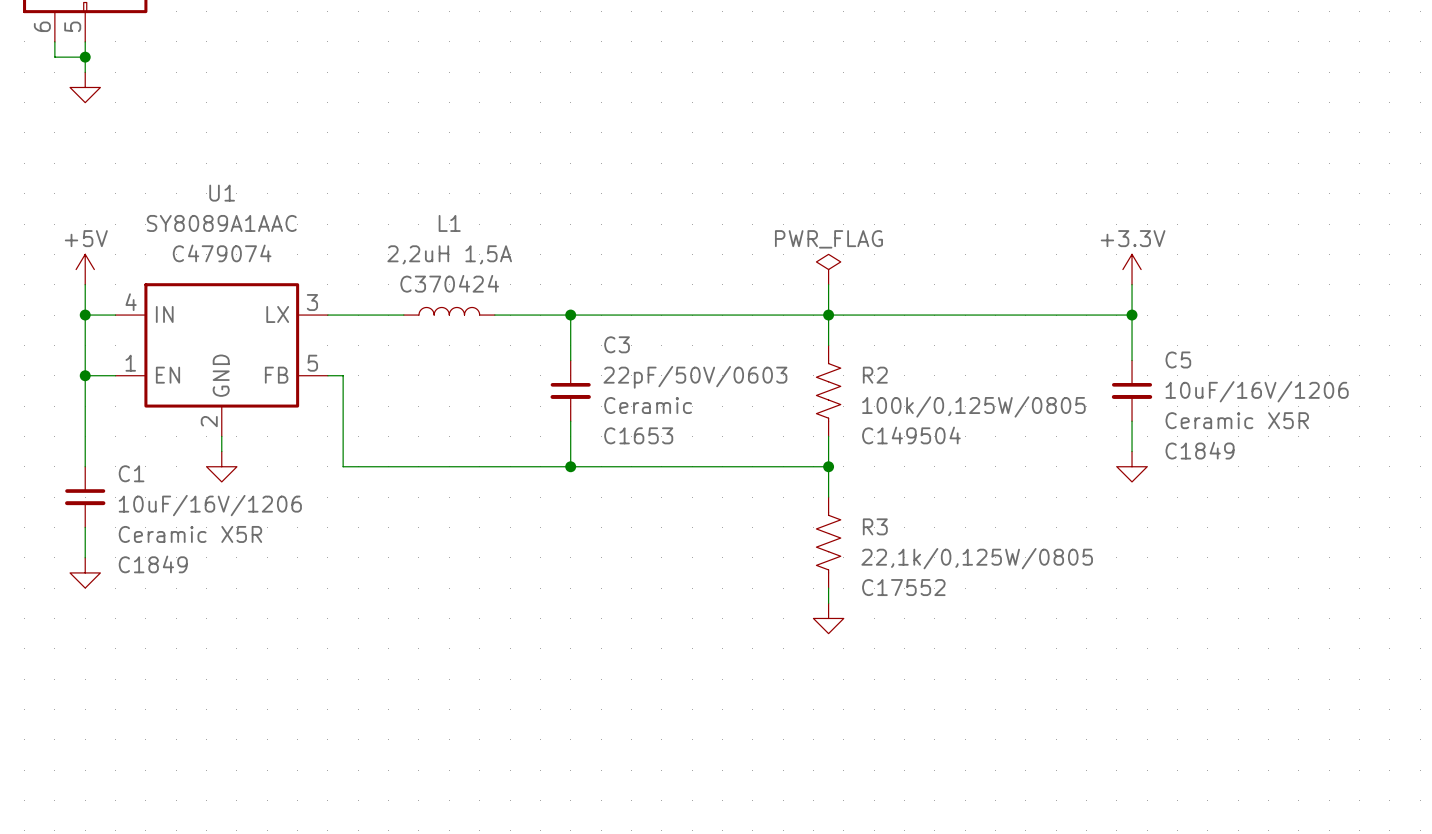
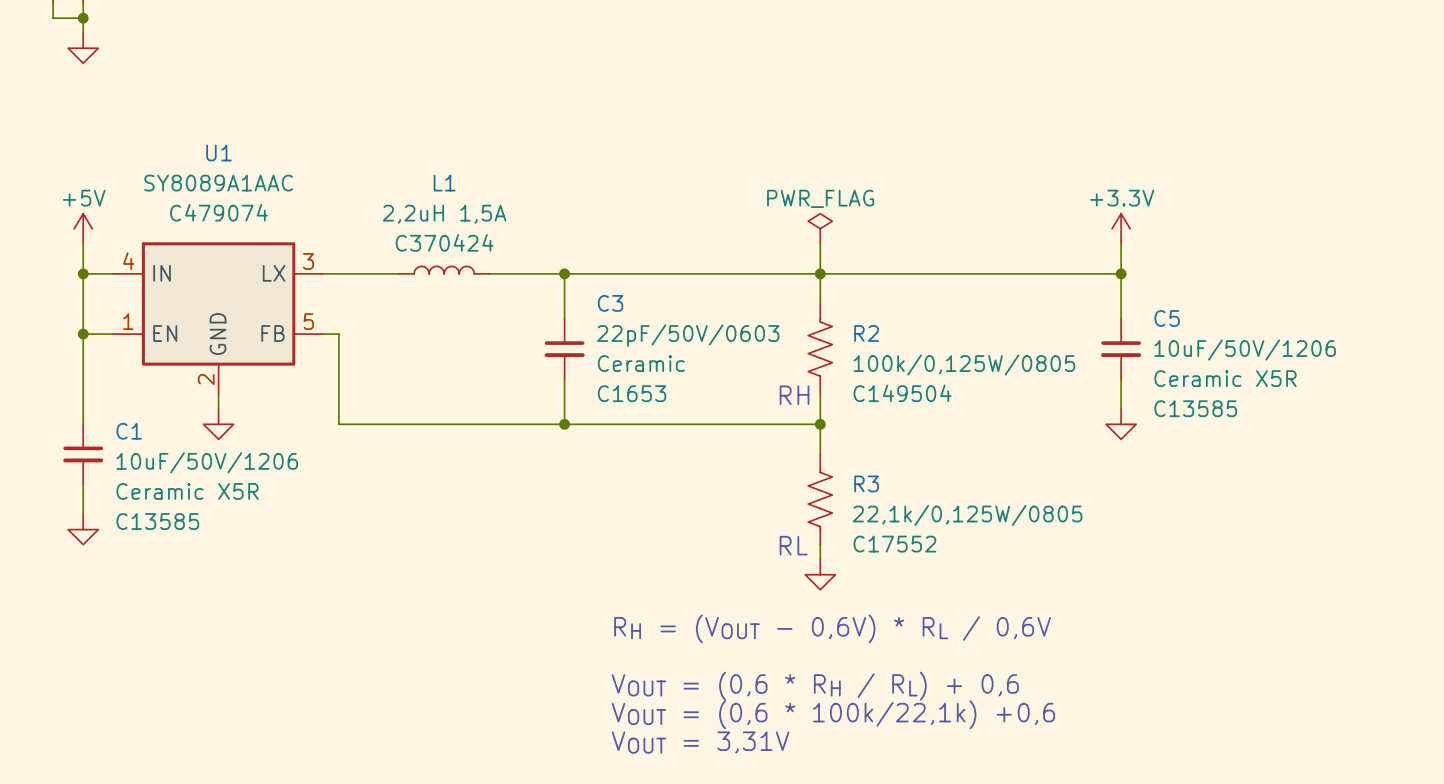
C5 value: 10uF/16V/1206 (1257, 391) -> 10uF/50V/1206 (1245, 349)
text: none -> RH (794, 395)
C5 text: C1849 (1200, 450) -> C13585 (1195, 408)
C1 value: 10uF/16V/1206 (210, 505) -> 10uF/50V/1206 (207, 462)
C1 text: C1849 (153, 564) -> C13585 (157, 521)
text: none -> RL (793, 545)
text: none -> RH = (VOUT - 0,6V) * RL / 0,6V (832, 628)
text: none -> VOUT = (0,6 * RH / RL) + 0,6 (815, 686)
text: none -> VOUT = (0,6 * 100k/22,1k) +0,6 (833, 714)
text: none -> VOUT = 3,31V (700, 742)

